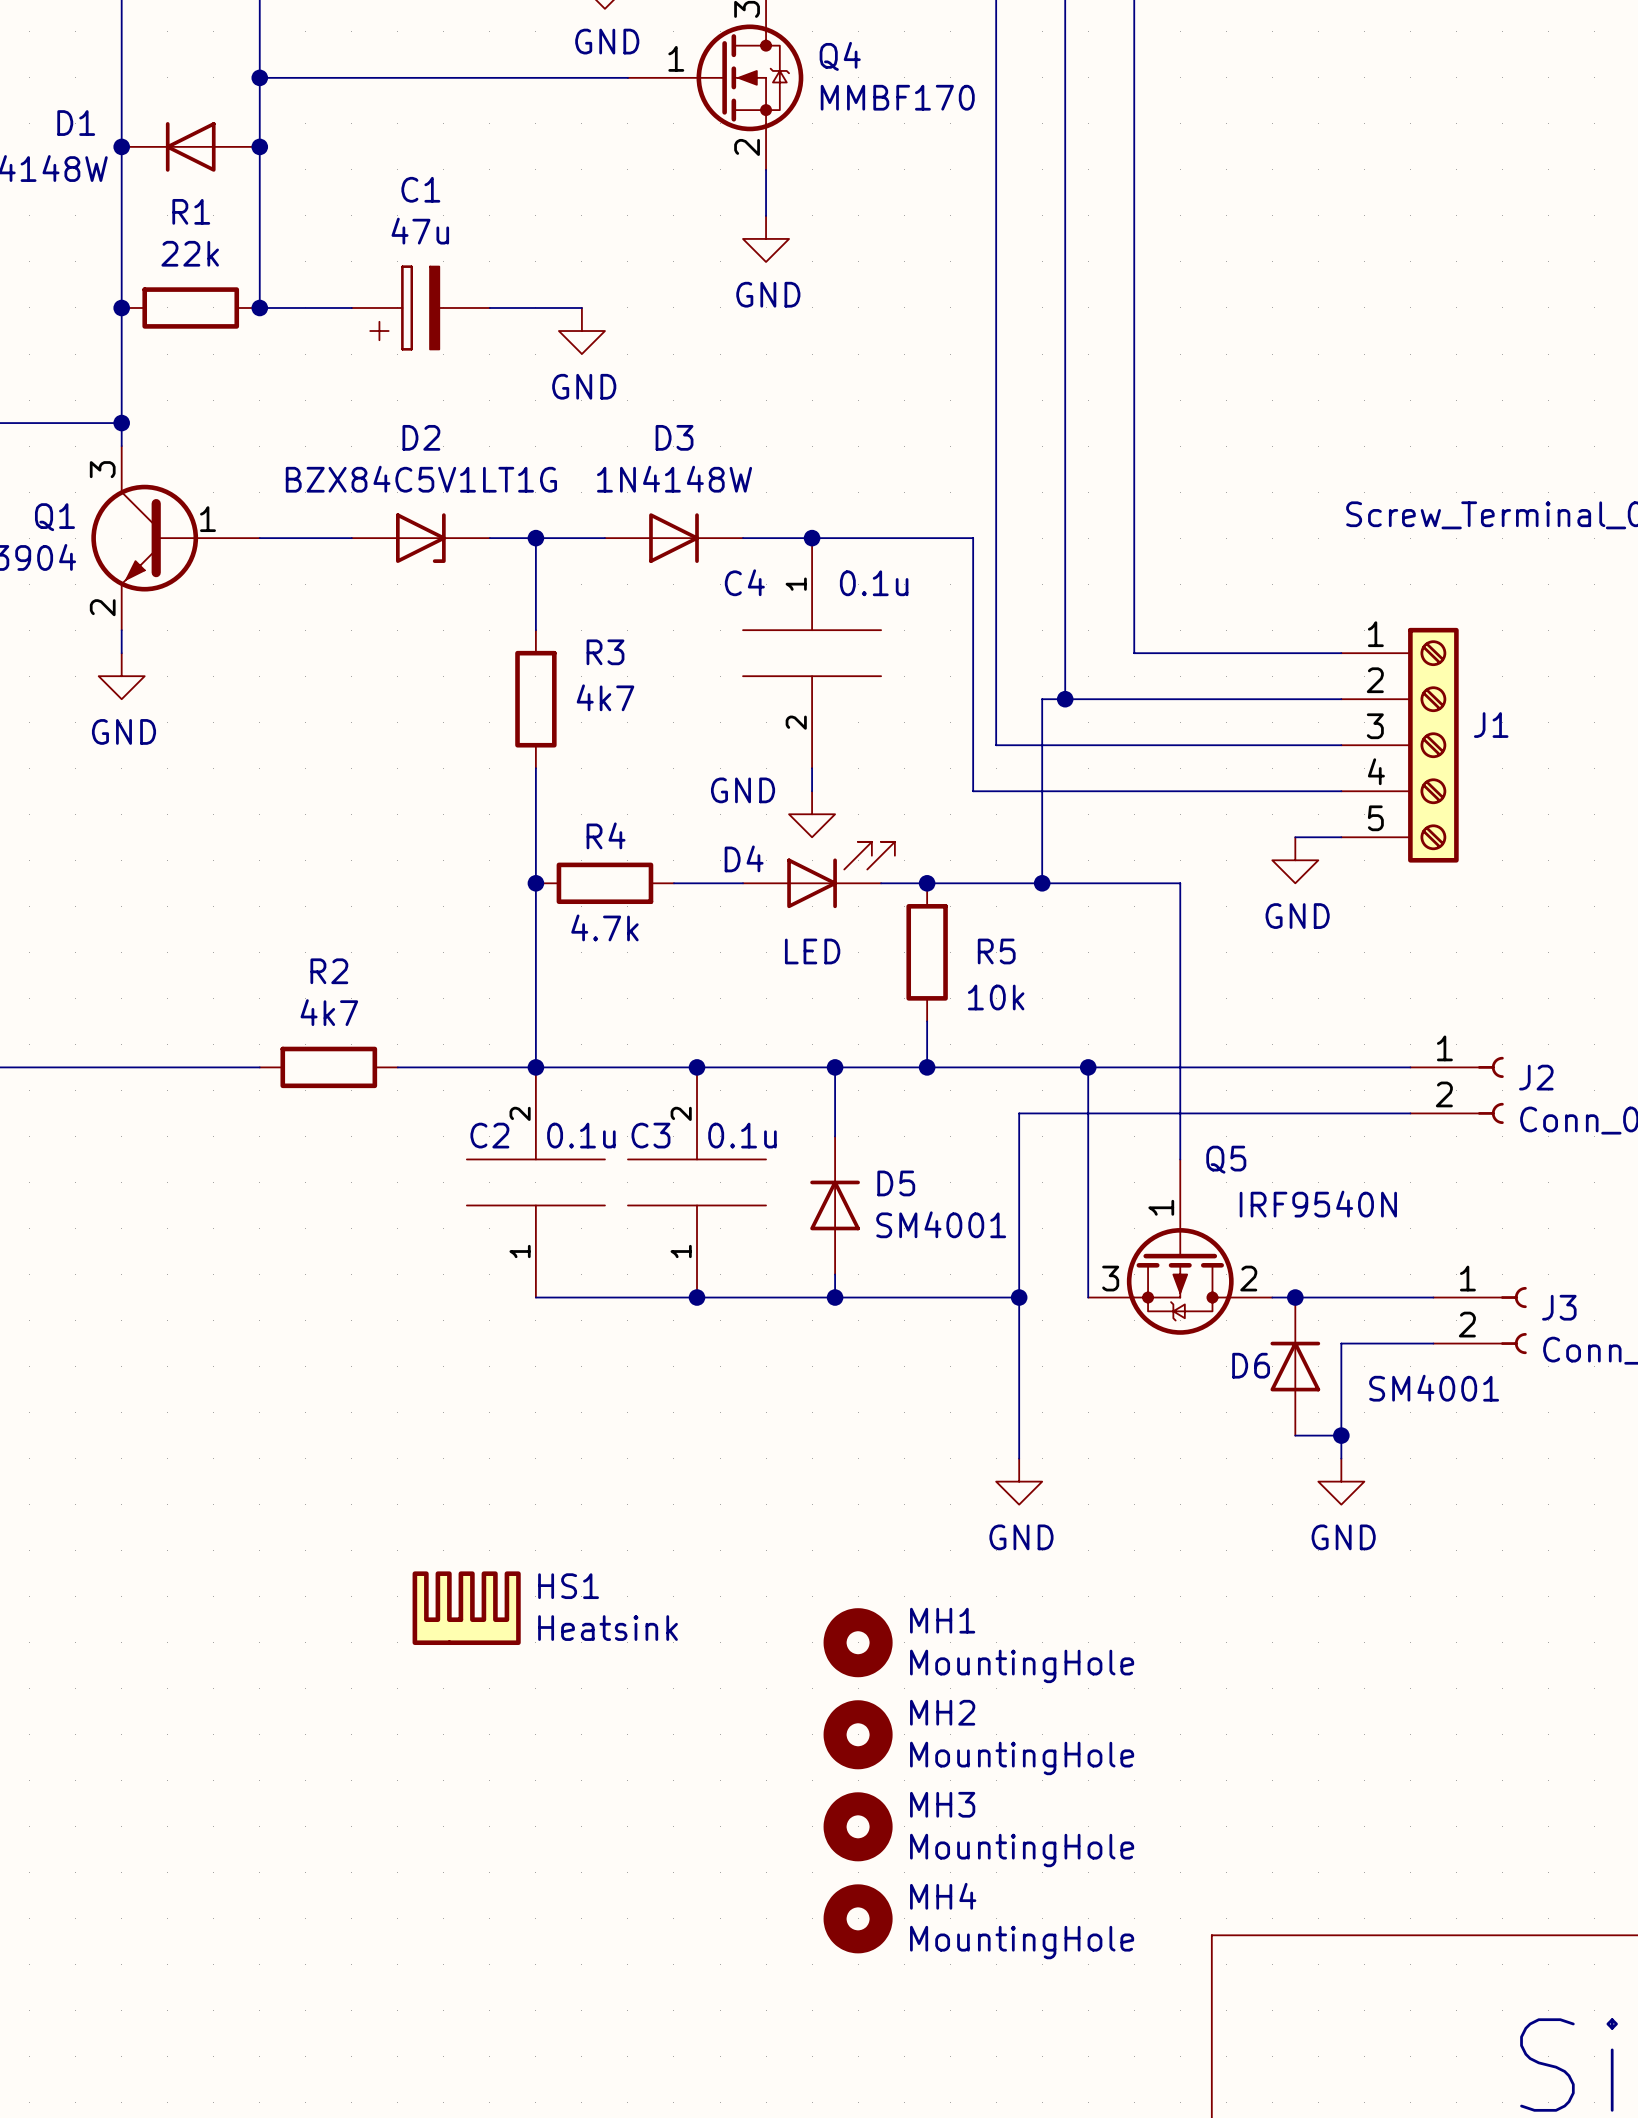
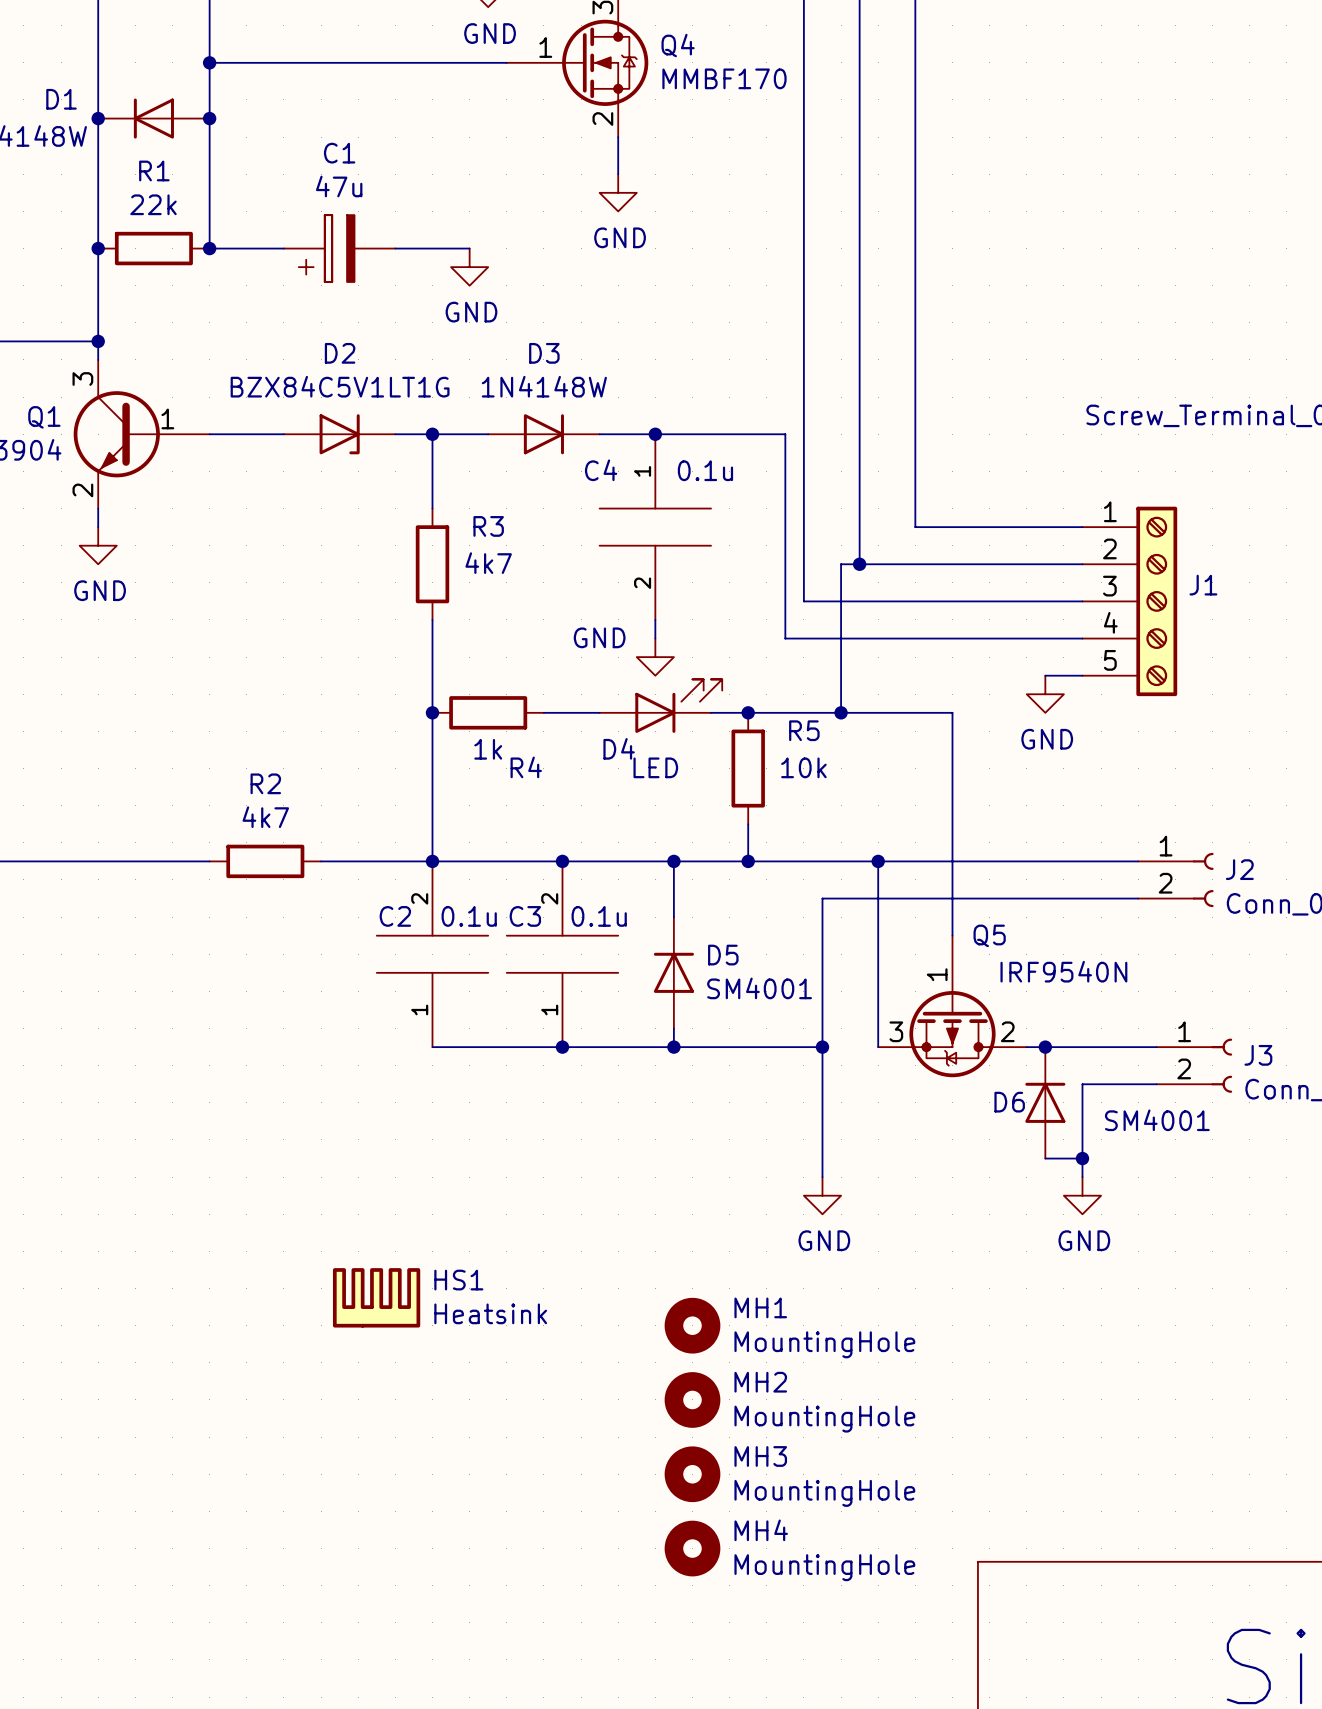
R4 name position: R4 (606, 835) -> R4 (526, 767)
D4 name position: D4 (744, 858) -> D4 (619, 748)
R4 value: 4.7k (604, 927) -> 1k (488, 749)
R5 name position: R5 (996, 951) -> R5 (804, 730)
R5 value position: 10k (996, 997) -> 10k (803, 767)

